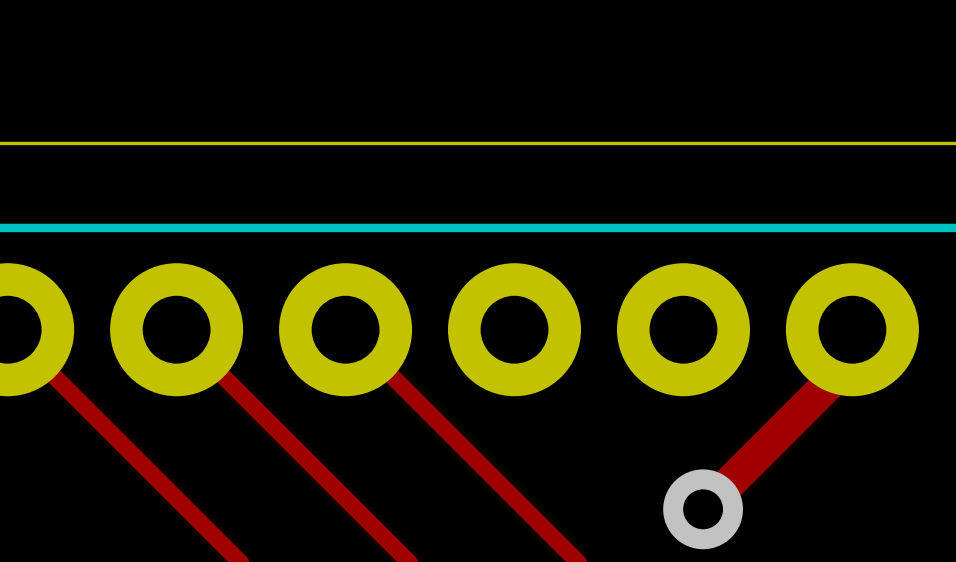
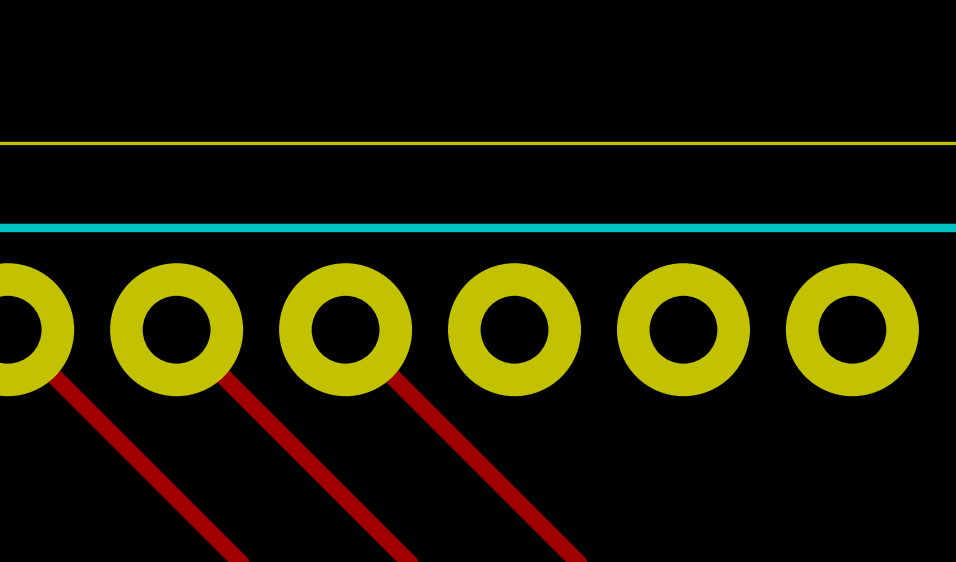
track: (852, 329) (852, 359) (703, 509) -> none
via: (703, 509) -> none

